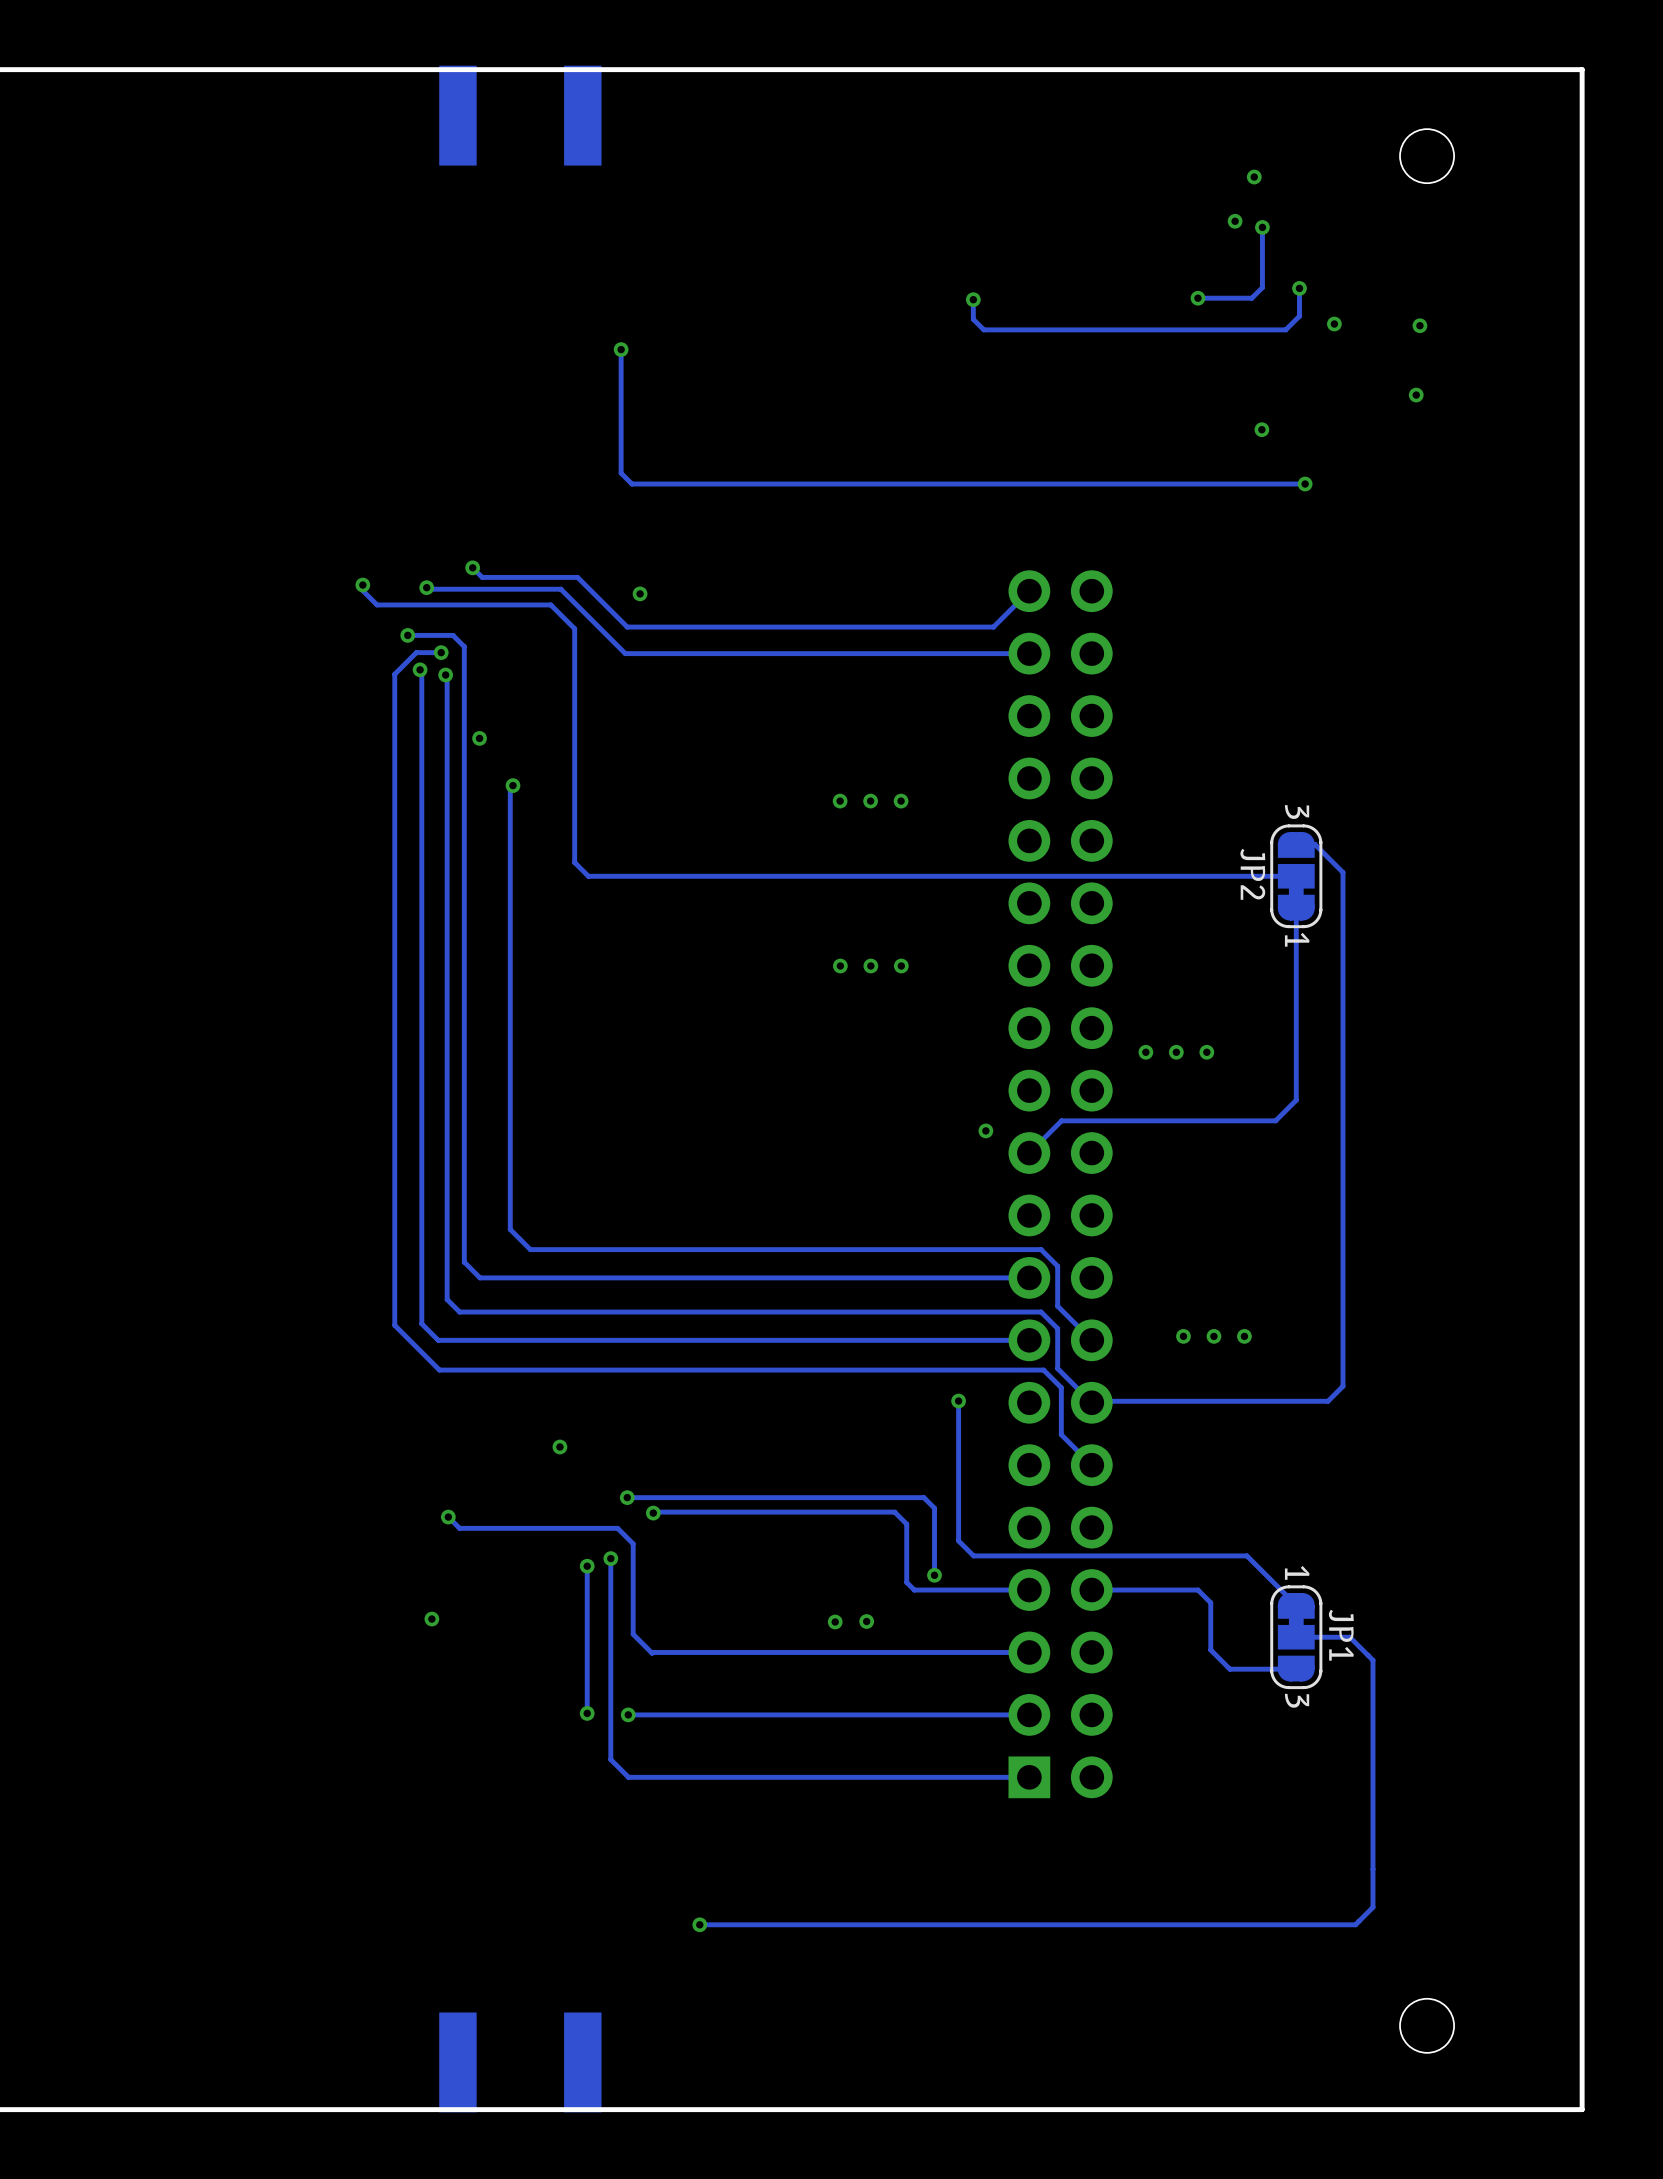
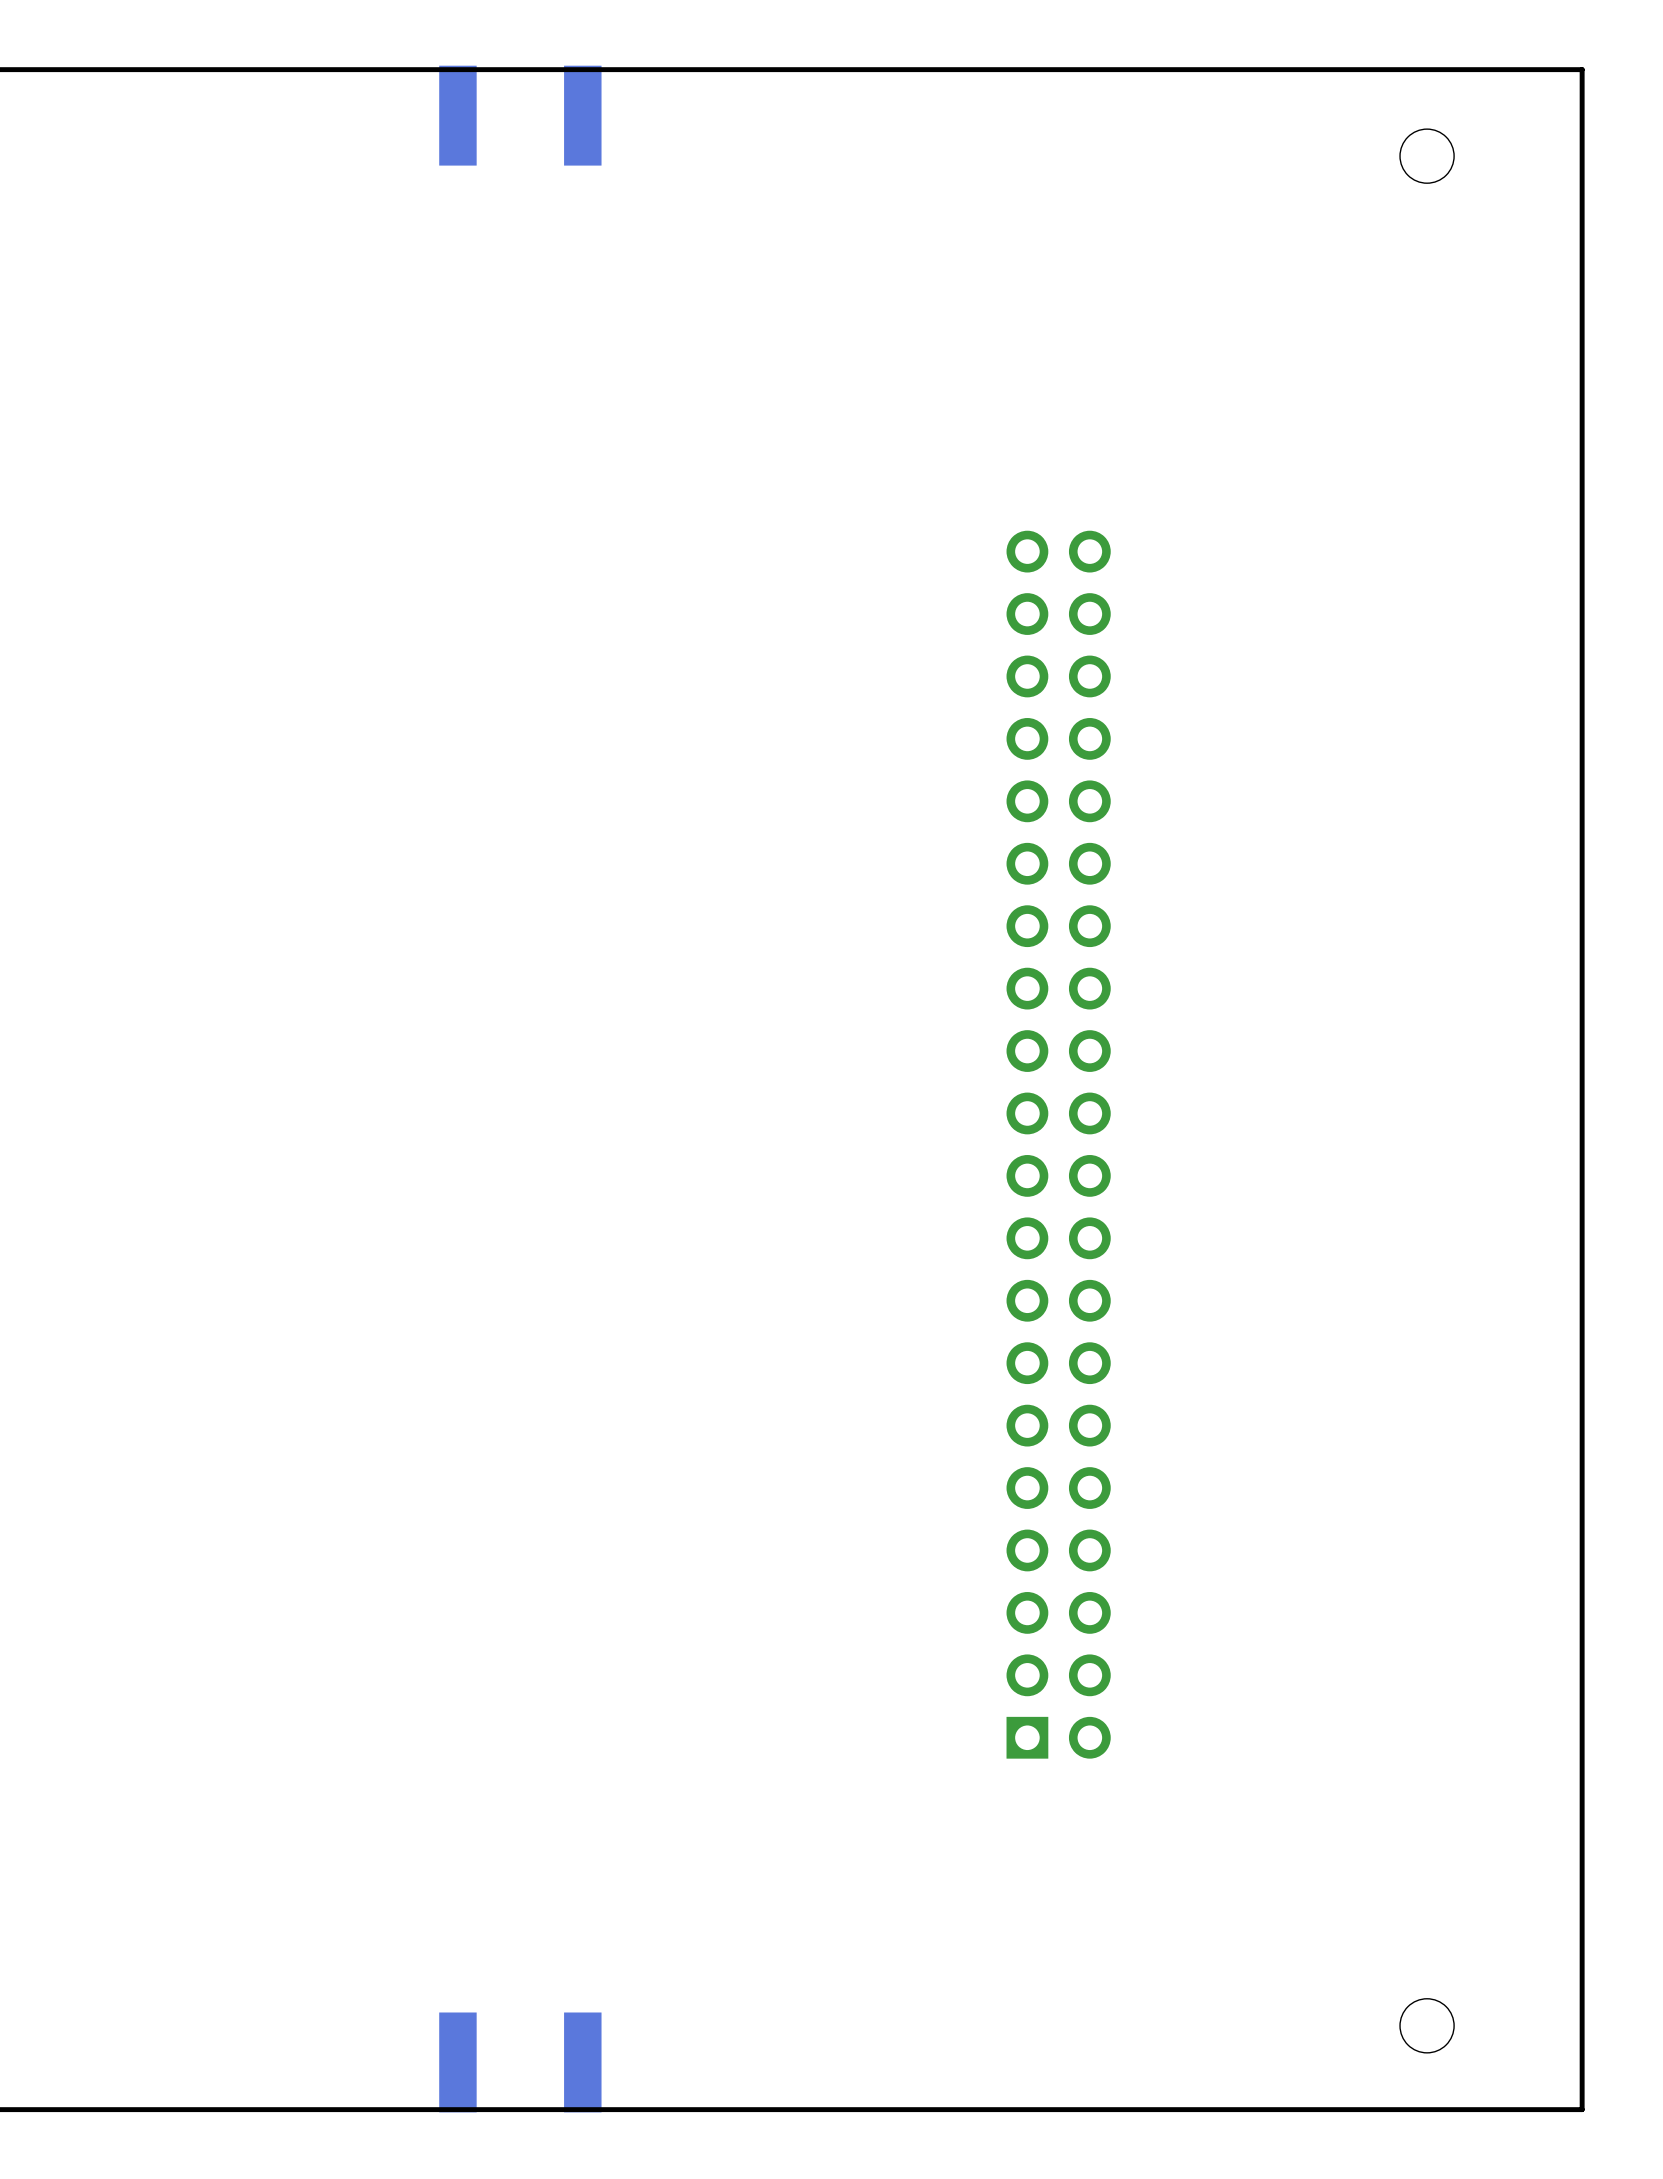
via: (1254, 177) -> none
via: (1235, 221) -> none
track: (1262, 227) (1262, 287) (1251, 298) (1197, 298) -> none
via: (1262, 227) -> none
track: (1299, 288) (1299, 316) (1285, 329) (983, 329) (973, 319) (973, 299) -> none
via: (1299, 288) -> none
via: (1197, 298) -> none
via: (973, 299) -> none
via: (1334, 324) -> none
via: (1419, 325) -> none
track: (621, 349) (621, 473) (631, 484) (1305, 484) -> none
via: (621, 349) -> none
via: (1416, 395) -> none
via: (1261, 429) -> none
via: (1305, 484) -> none
track: (472, 567) (482, 577) (577, 577) (627, 627) (993, 627) (1029, 591) -> none
via: (472, 567) -> none
track: (362, 585) (362, 590) (377, 604) (550, 604) (574, 628) (574, 862) (588, 876) (1296, 876) -> none
via: (362, 585) -> none
track: (426, 587) (428, 589) (560, 589) (625, 653) (1029, 653) -> none
via: (426, 587) -> none
via: (640, 593) -> none
track: (407, 635) (453, 635) (464, 646) (464, 1262) (480, 1277) (1029, 1277) -> none
via: (407, 635) -> none
track: (441, 652) (416, 652) (394, 674) (394, 1325) (439, 1370) (1043, 1370) (1061, 1387) (1061, 1434) (1091, 1465) -> none
via: (441, 652) -> none
track: (420, 669) (421, 671) (421, 1323) (438, 1340) (1029, 1340) -> none
via: (420, 669) -> none
track: (445, 675) (447, 1299) (459, 1312) (1041, 1312) (1057, 1328) (1057, 1368) (1091, 1402) (1328, 1401) (1343, 1386) (1343, 872) (1314, 844) (1296, 844) -> none
via: (445, 675) -> none
via: (479, 738) -> none
track: (512, 785) (510, 788) (510, 1229) (530, 1249) (1041, 1249) (1057, 1266) (1057, 1306) (1091, 1340) -> none
via: (512, 785) -> none
via: (840, 801) -> none
via: (870, 801) -> none
via: (901, 801) -> none
JP2: (1296, 876) -> none
track: (1296, 908) (1296, 1100) (1275, 1120) (1061, 1120) (1029, 1153) -> none
via: (840, 966) -> none
via: (870, 966) -> none
via: (901, 966) -> none
via: (1145, 1052) -> none
via: (1176, 1052) -> none
via: (1206, 1052) -> none
via: (985, 1130) -> none
part position: (1060, 1184) -> (1058, 1144)
via: (1183, 1336) -> none
via: (1213, 1336) -> none
via: (1244, 1336) -> none
track: (958, 1401) (958, 1540) (973, 1555) (1246, 1555) (1296, 1605) -> none
via: (958, 1401) -> none
via: (559, 1447) -> none
track: (627, 1497) (923, 1497) (934, 1508) (934, 1575) -> none
via: (627, 1497) -> none
track: (653, 1513) (894, 1512) (906, 1524) (906, 1582) (914, 1590) (1029, 1590) -> none
via: (653, 1513) -> none
track: (448, 1517) (459, 1528) (617, 1528) (633, 1543) (633, 1634) (652, 1653) (1029, 1652) -> none
via: (448, 1517) -> none
track: (610, 1558) (610, 1759) (628, 1777) (1029, 1777) -> none
via: (610, 1558) -> none
track: (587, 1566) (587, 1713) -> none
via: (587, 1566) -> none
via: (934, 1575) -> none
track: (1091, 1590) (1197, 1590) (1210, 1602) (1210, 1650) (1229, 1669) (1296, 1669) -> none
via: (431, 1619) -> none
via: (835, 1621) -> none
via: (866, 1621) -> none
track: (1296, 1637) (1349, 1637) (1372, 1660) (1372, 1907) (1355, 1924) (699, 1924) -> none
JP1: (1296, 1637) -> none
via: (587, 1713) -> none
via: (628, 1714) -> none
track: (1029, 1714) (628, 1714) -> none
via: (699, 1924) -> none

